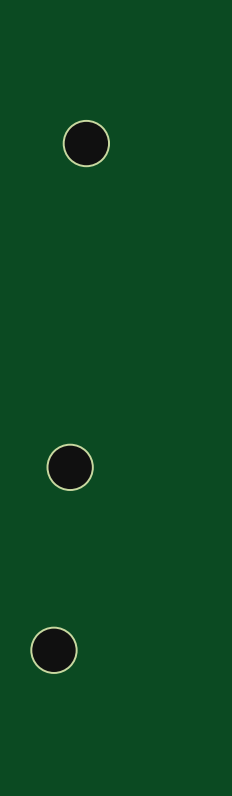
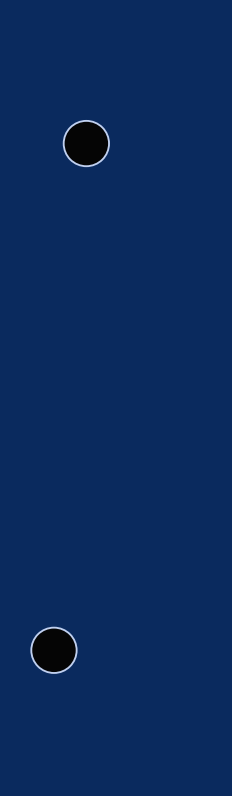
part: (70, 467) -> none

